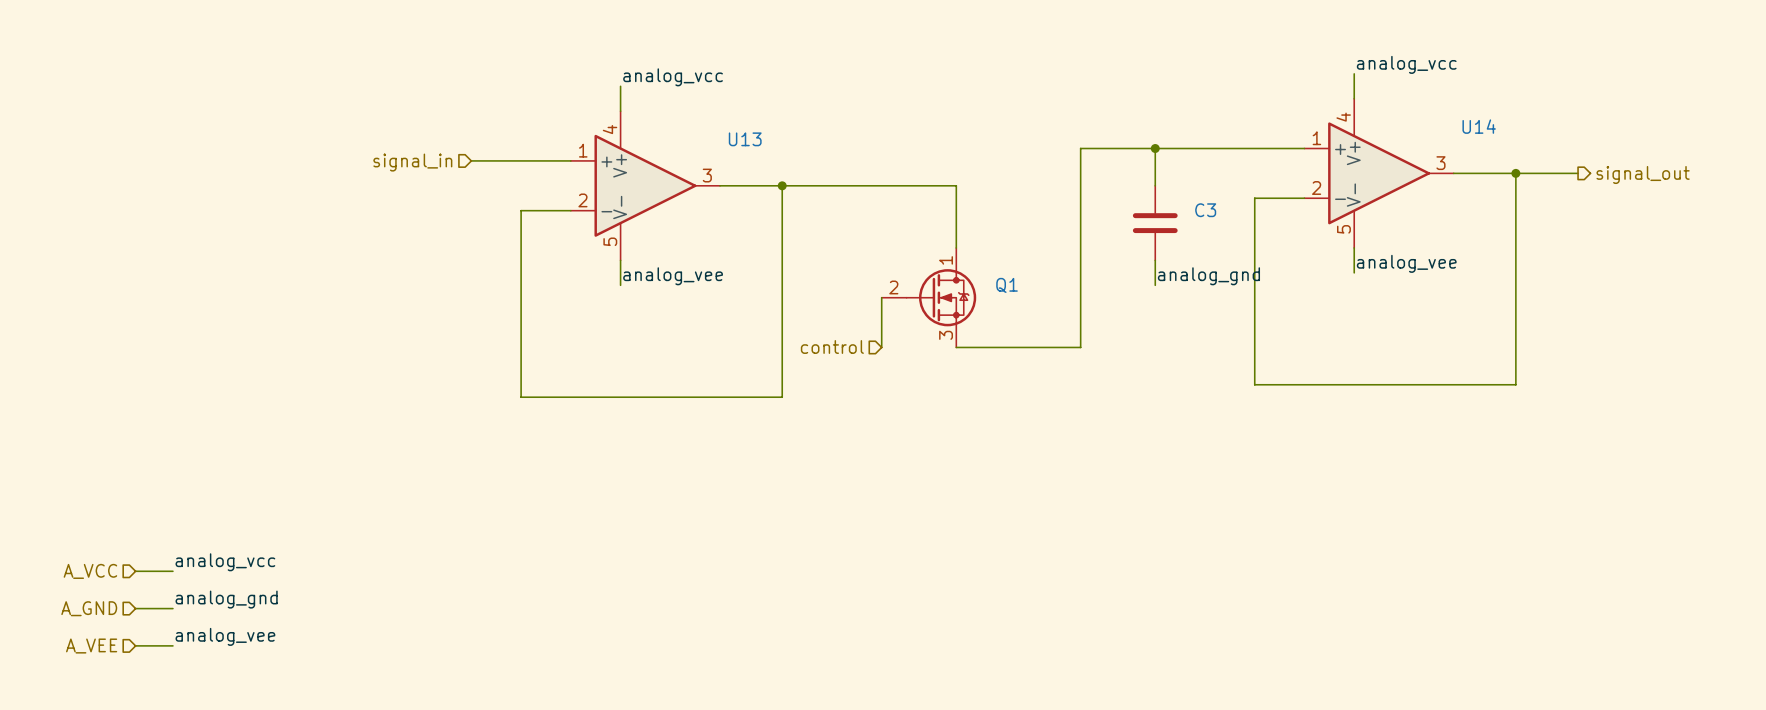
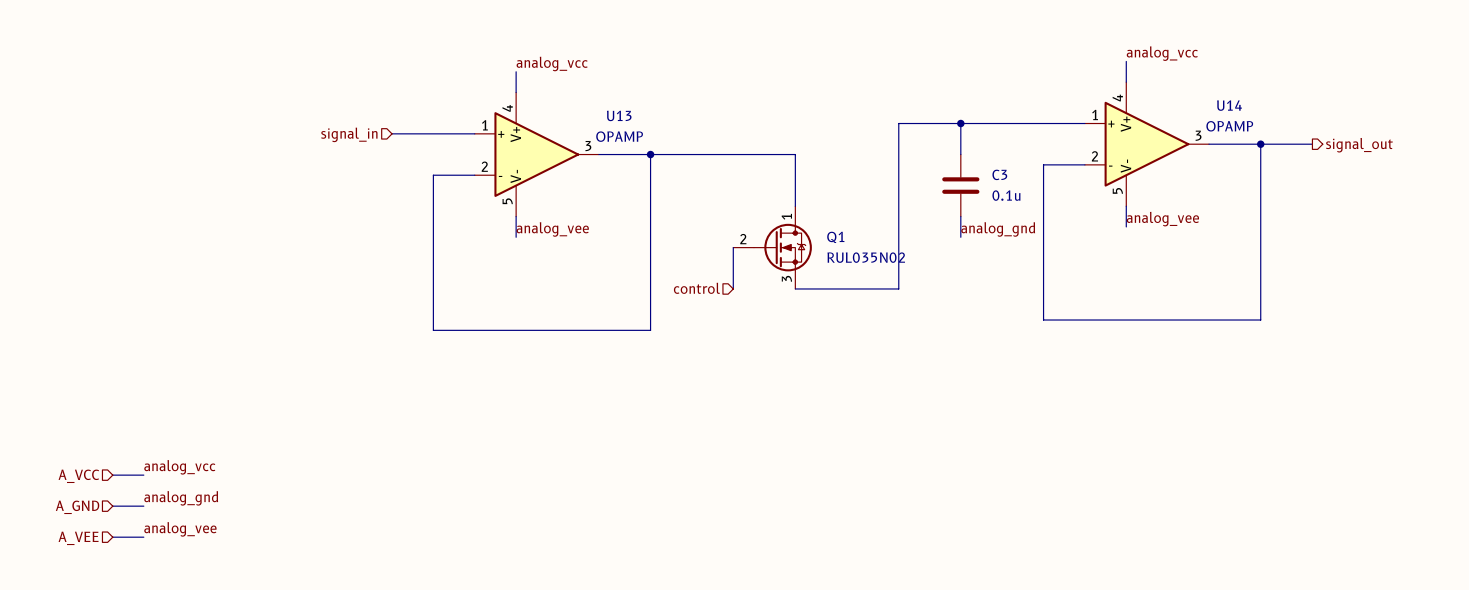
U14 value: none -> OPAMP (1229, 126)
U13 value: none -> OPAMP (619, 136)
C3 value: none -> 0.1u (1006, 195)
Q1 value: none -> RUL035N02 (866, 257)

